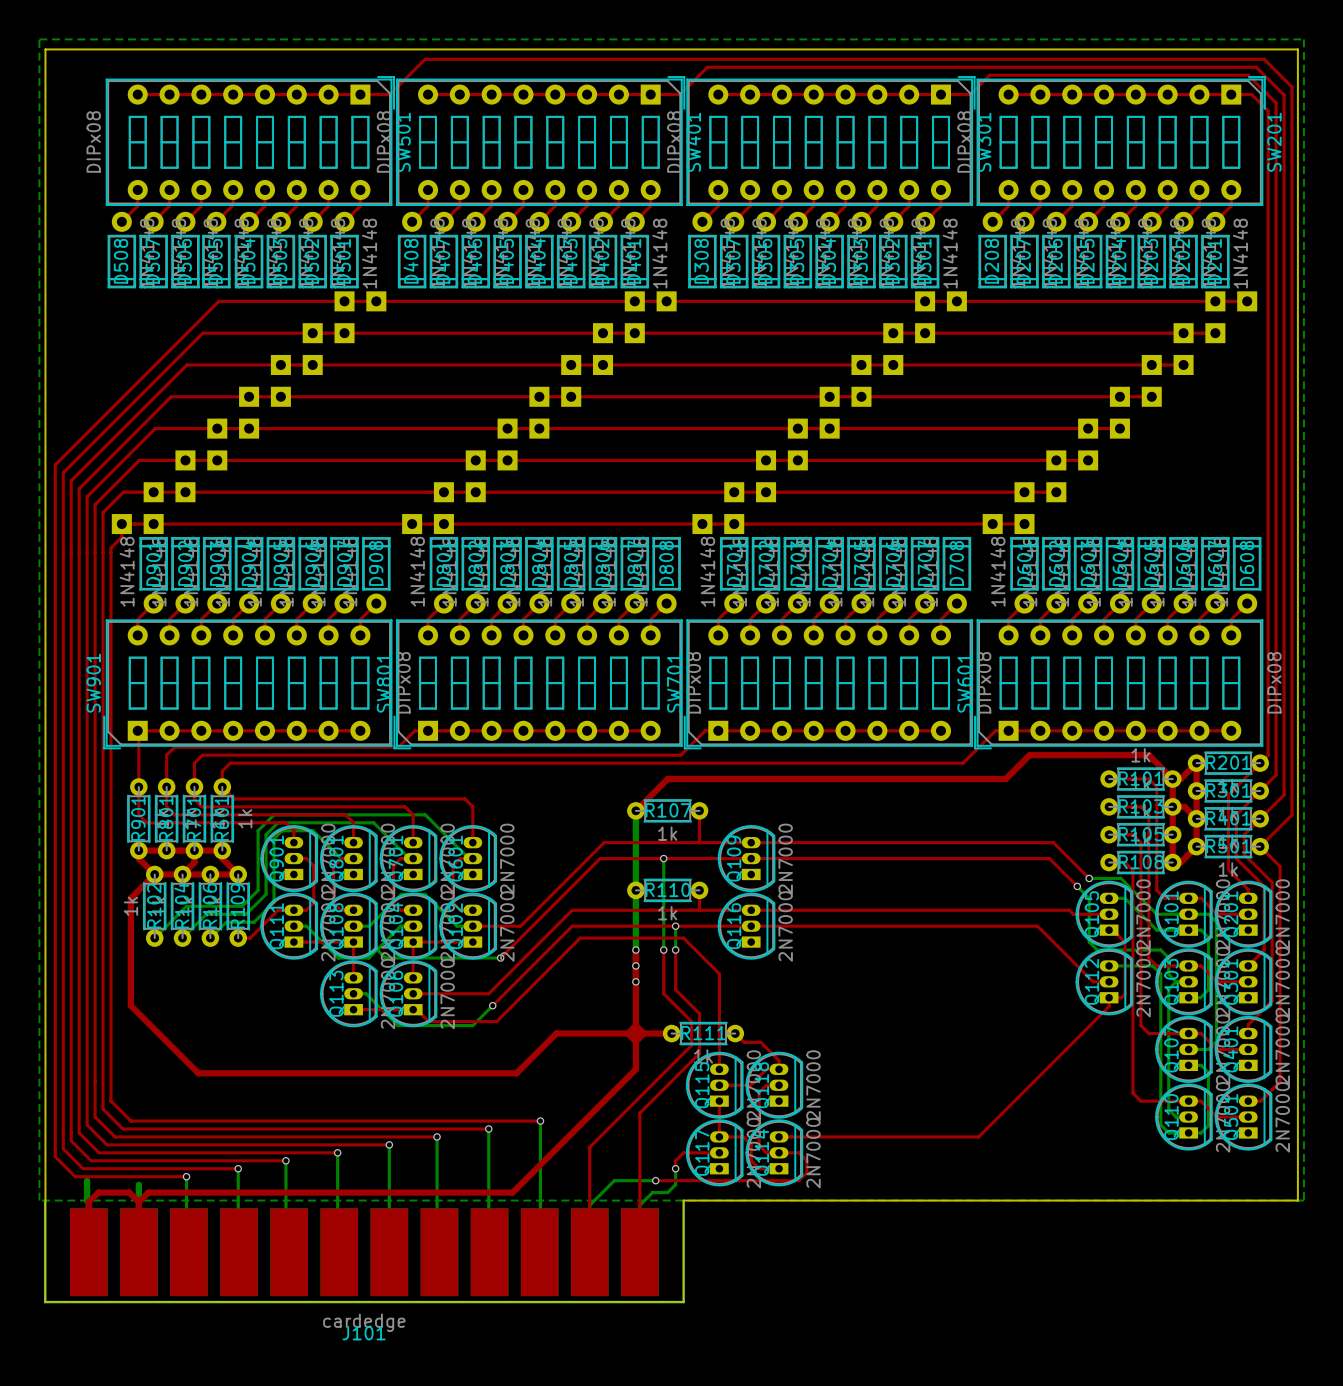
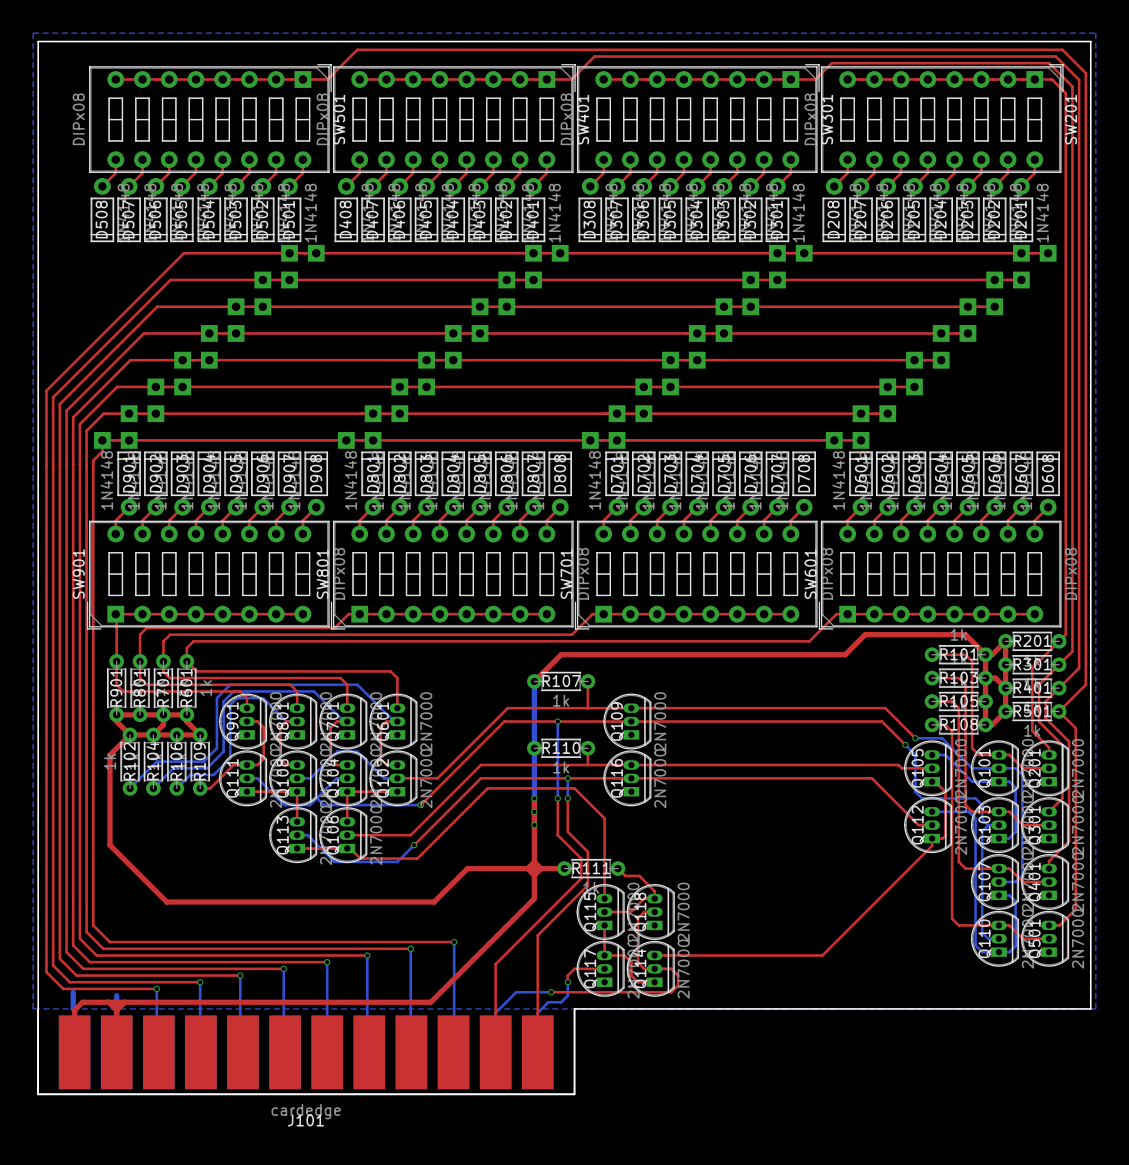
top track: none -> (108, 1002) (124, 1002)

